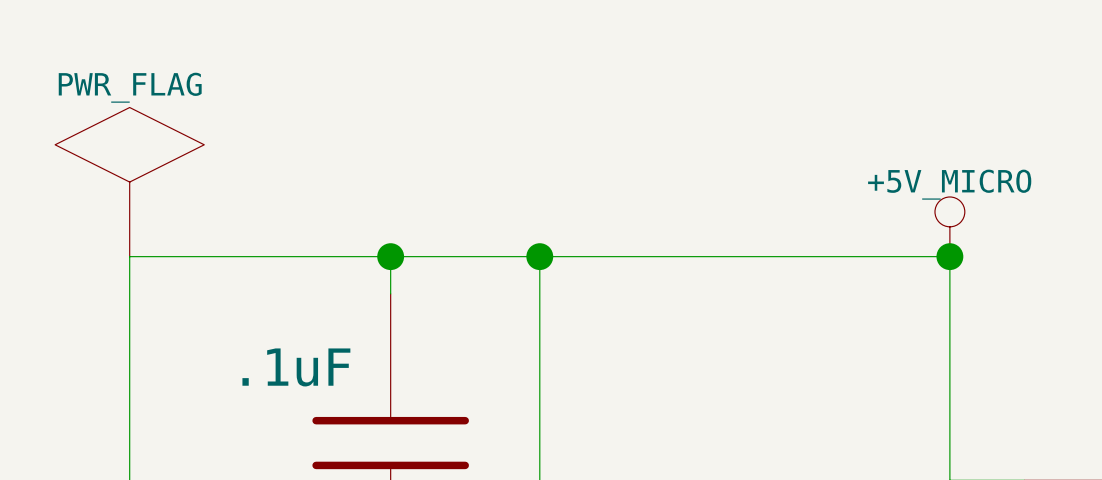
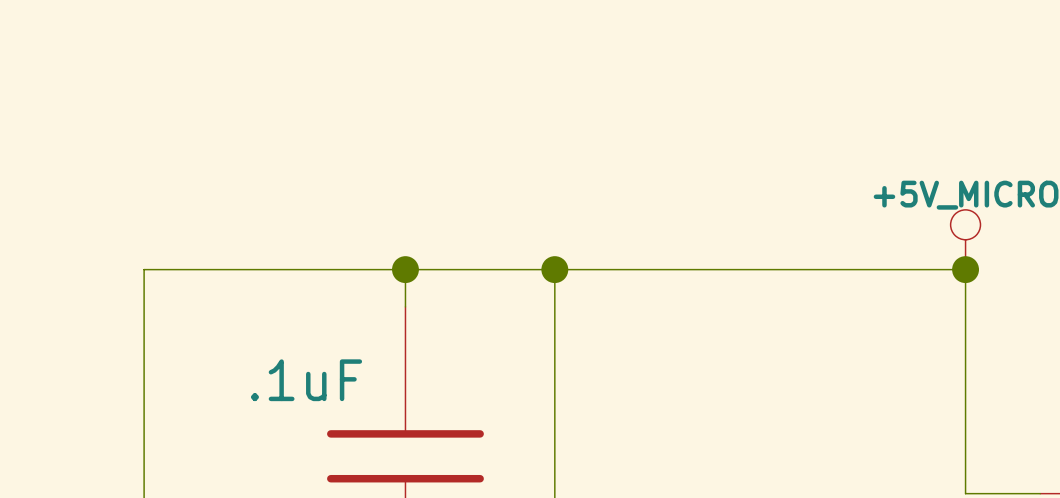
power symbol: PWR_FLAG (129, 182) -> none

